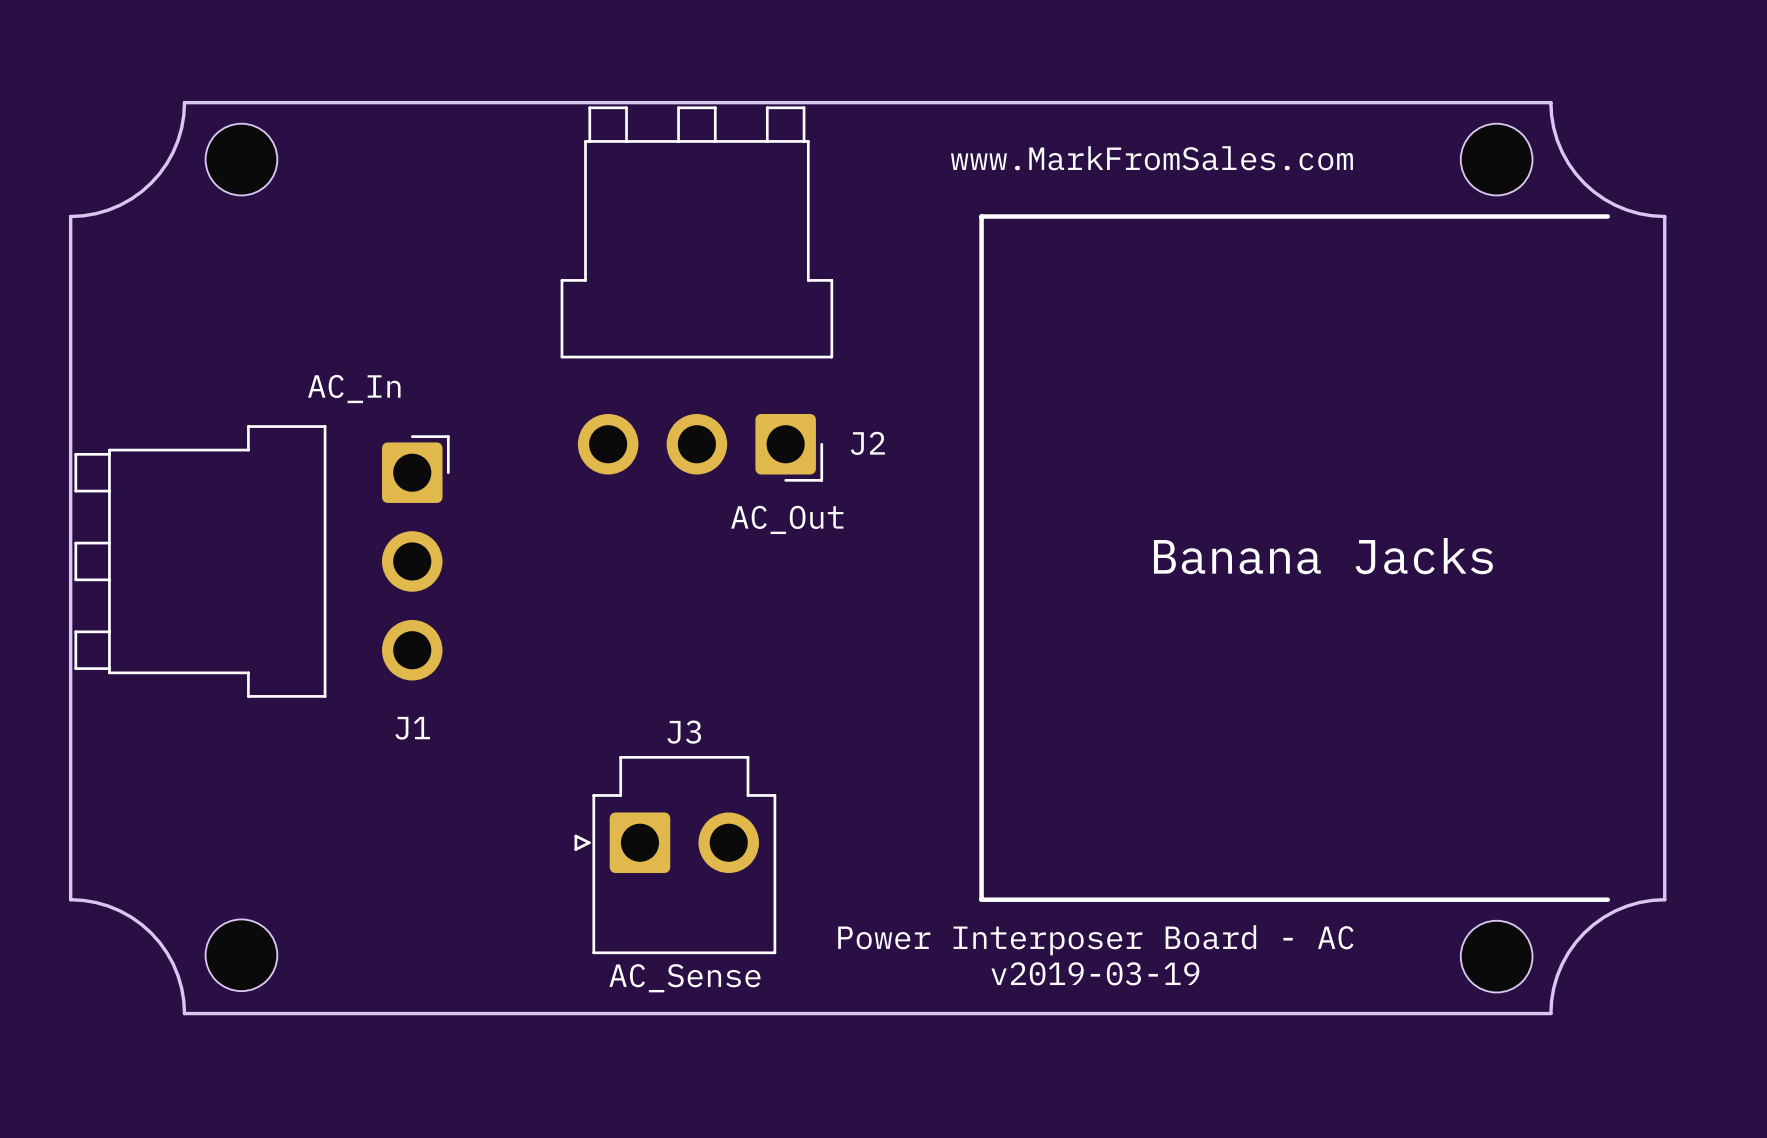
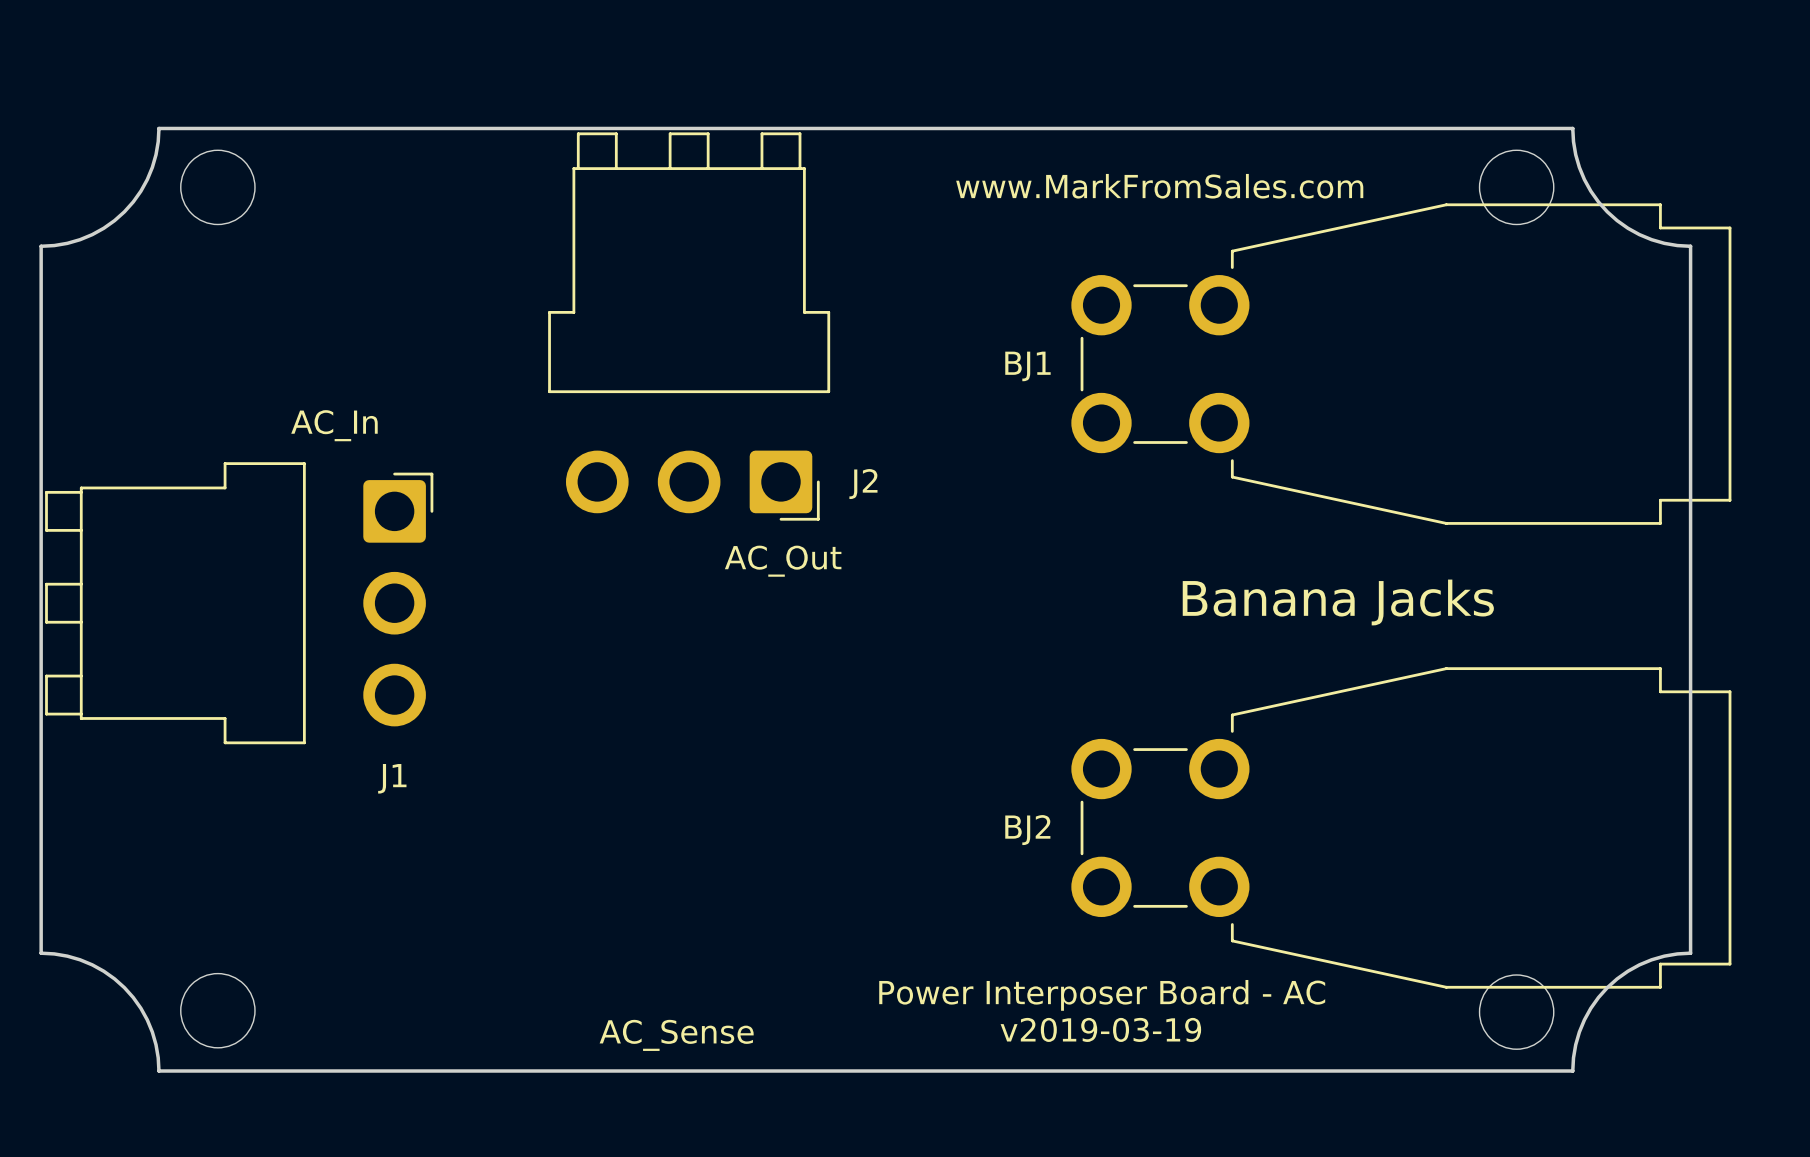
line: (1607, 216) (981, 216) (981, 899) (1607, 899) -> none
BJ1: none -> (1401, 364)
BJ2: none -> (1401, 827)
J3: (675, 855) -> none

